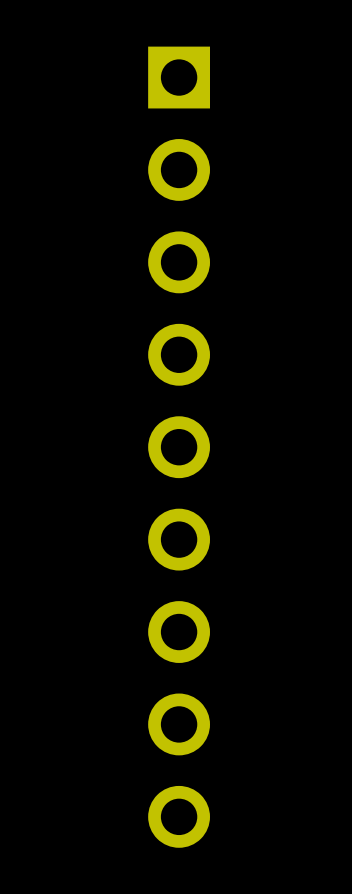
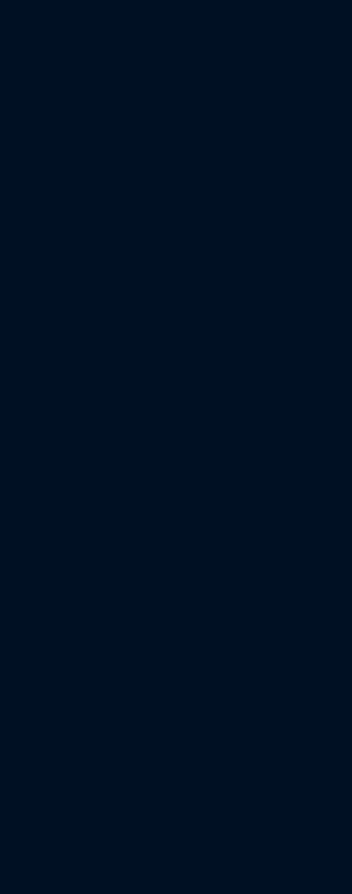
part: (179, 447) -> none

